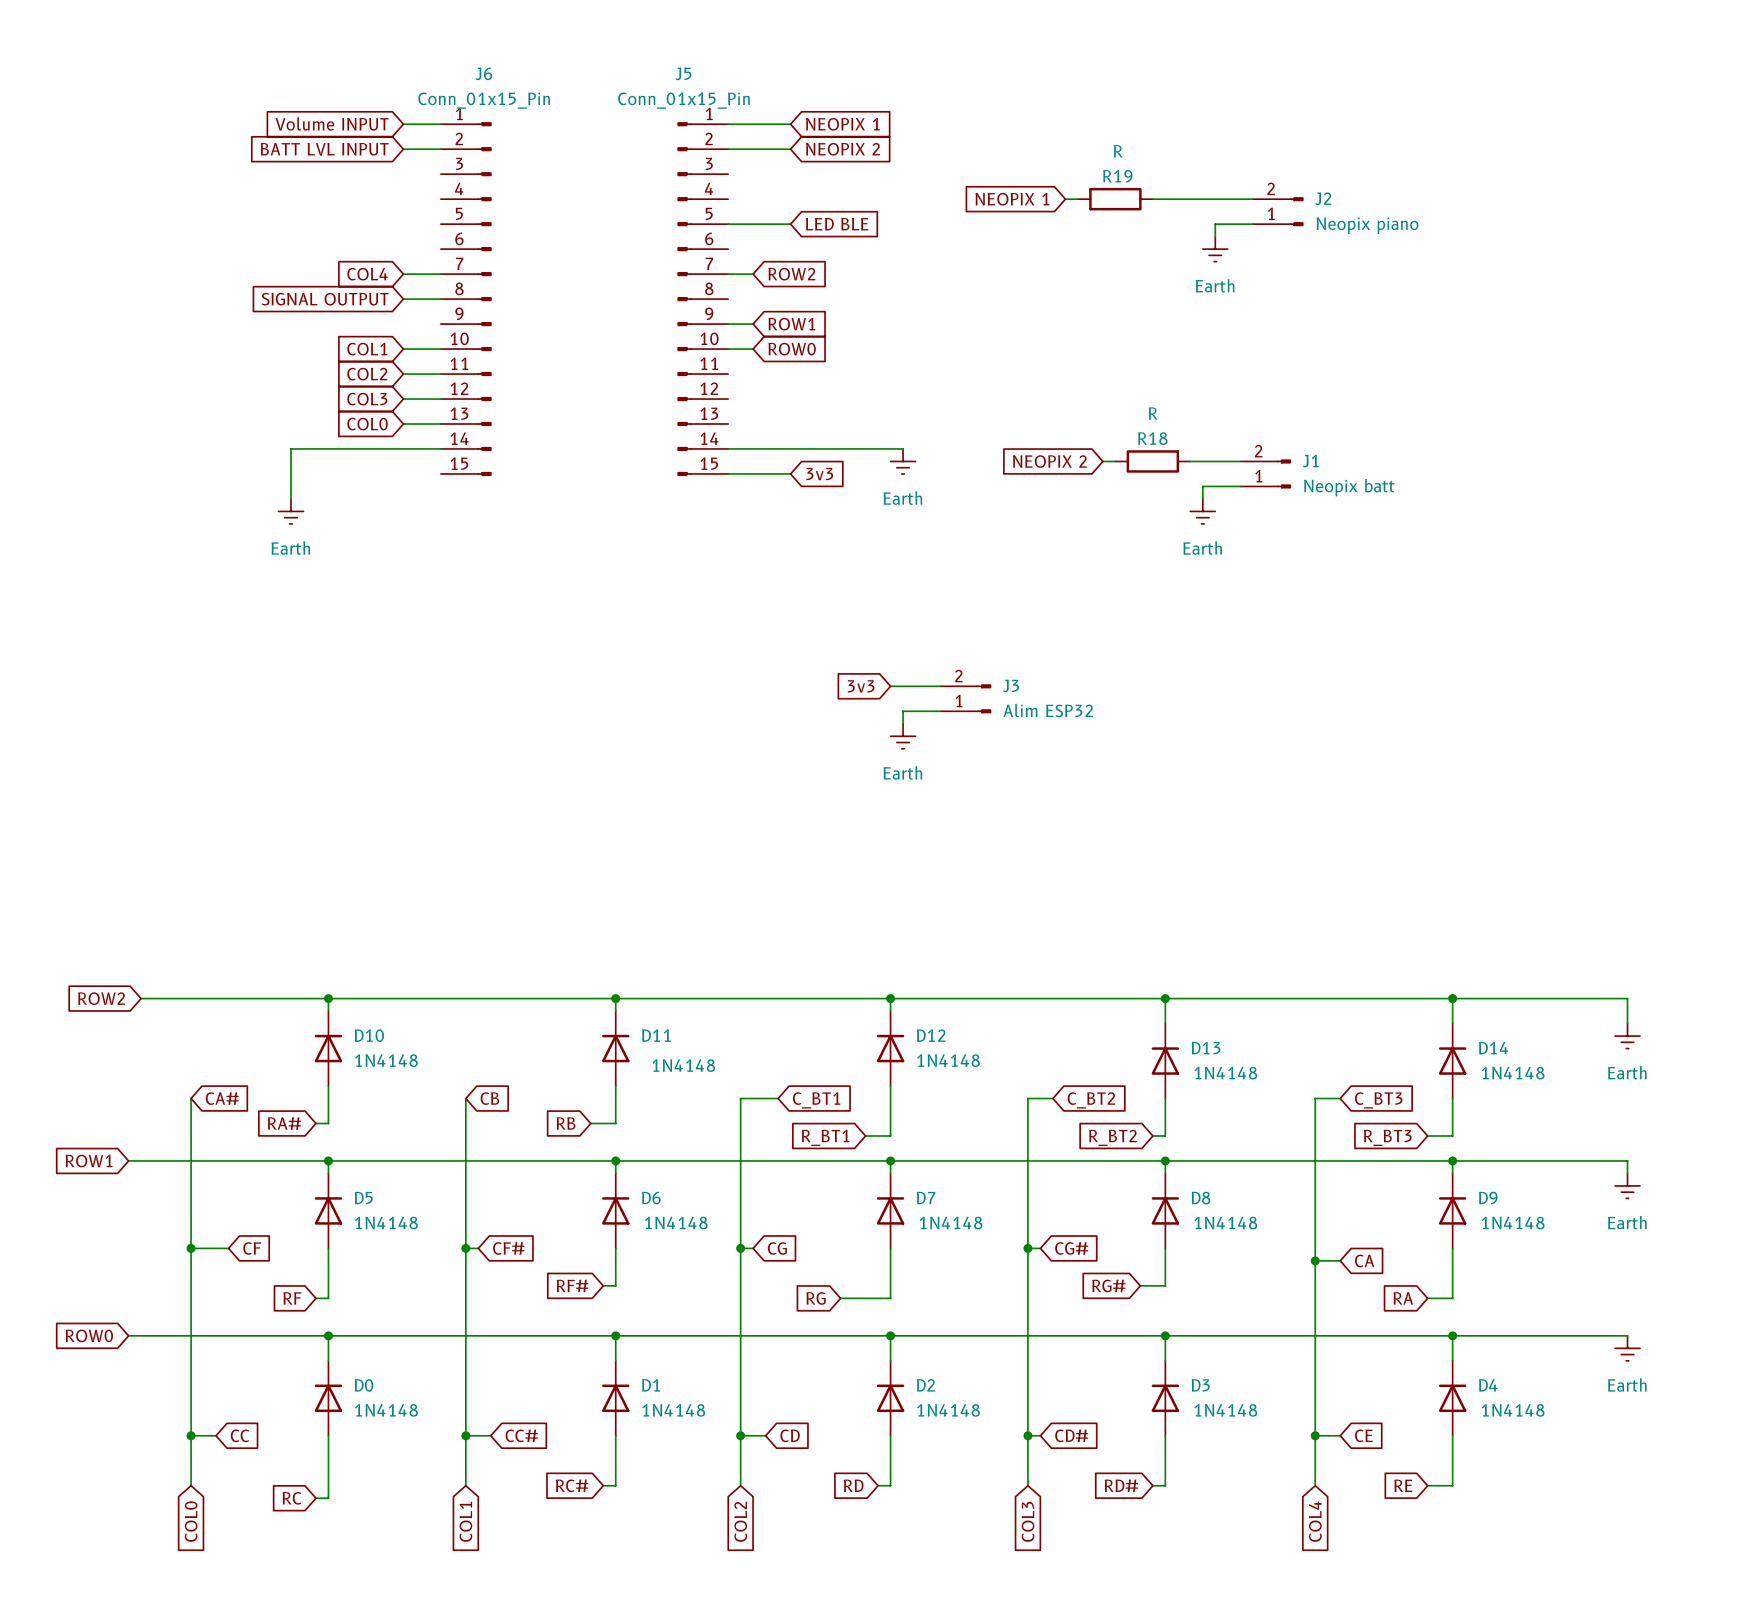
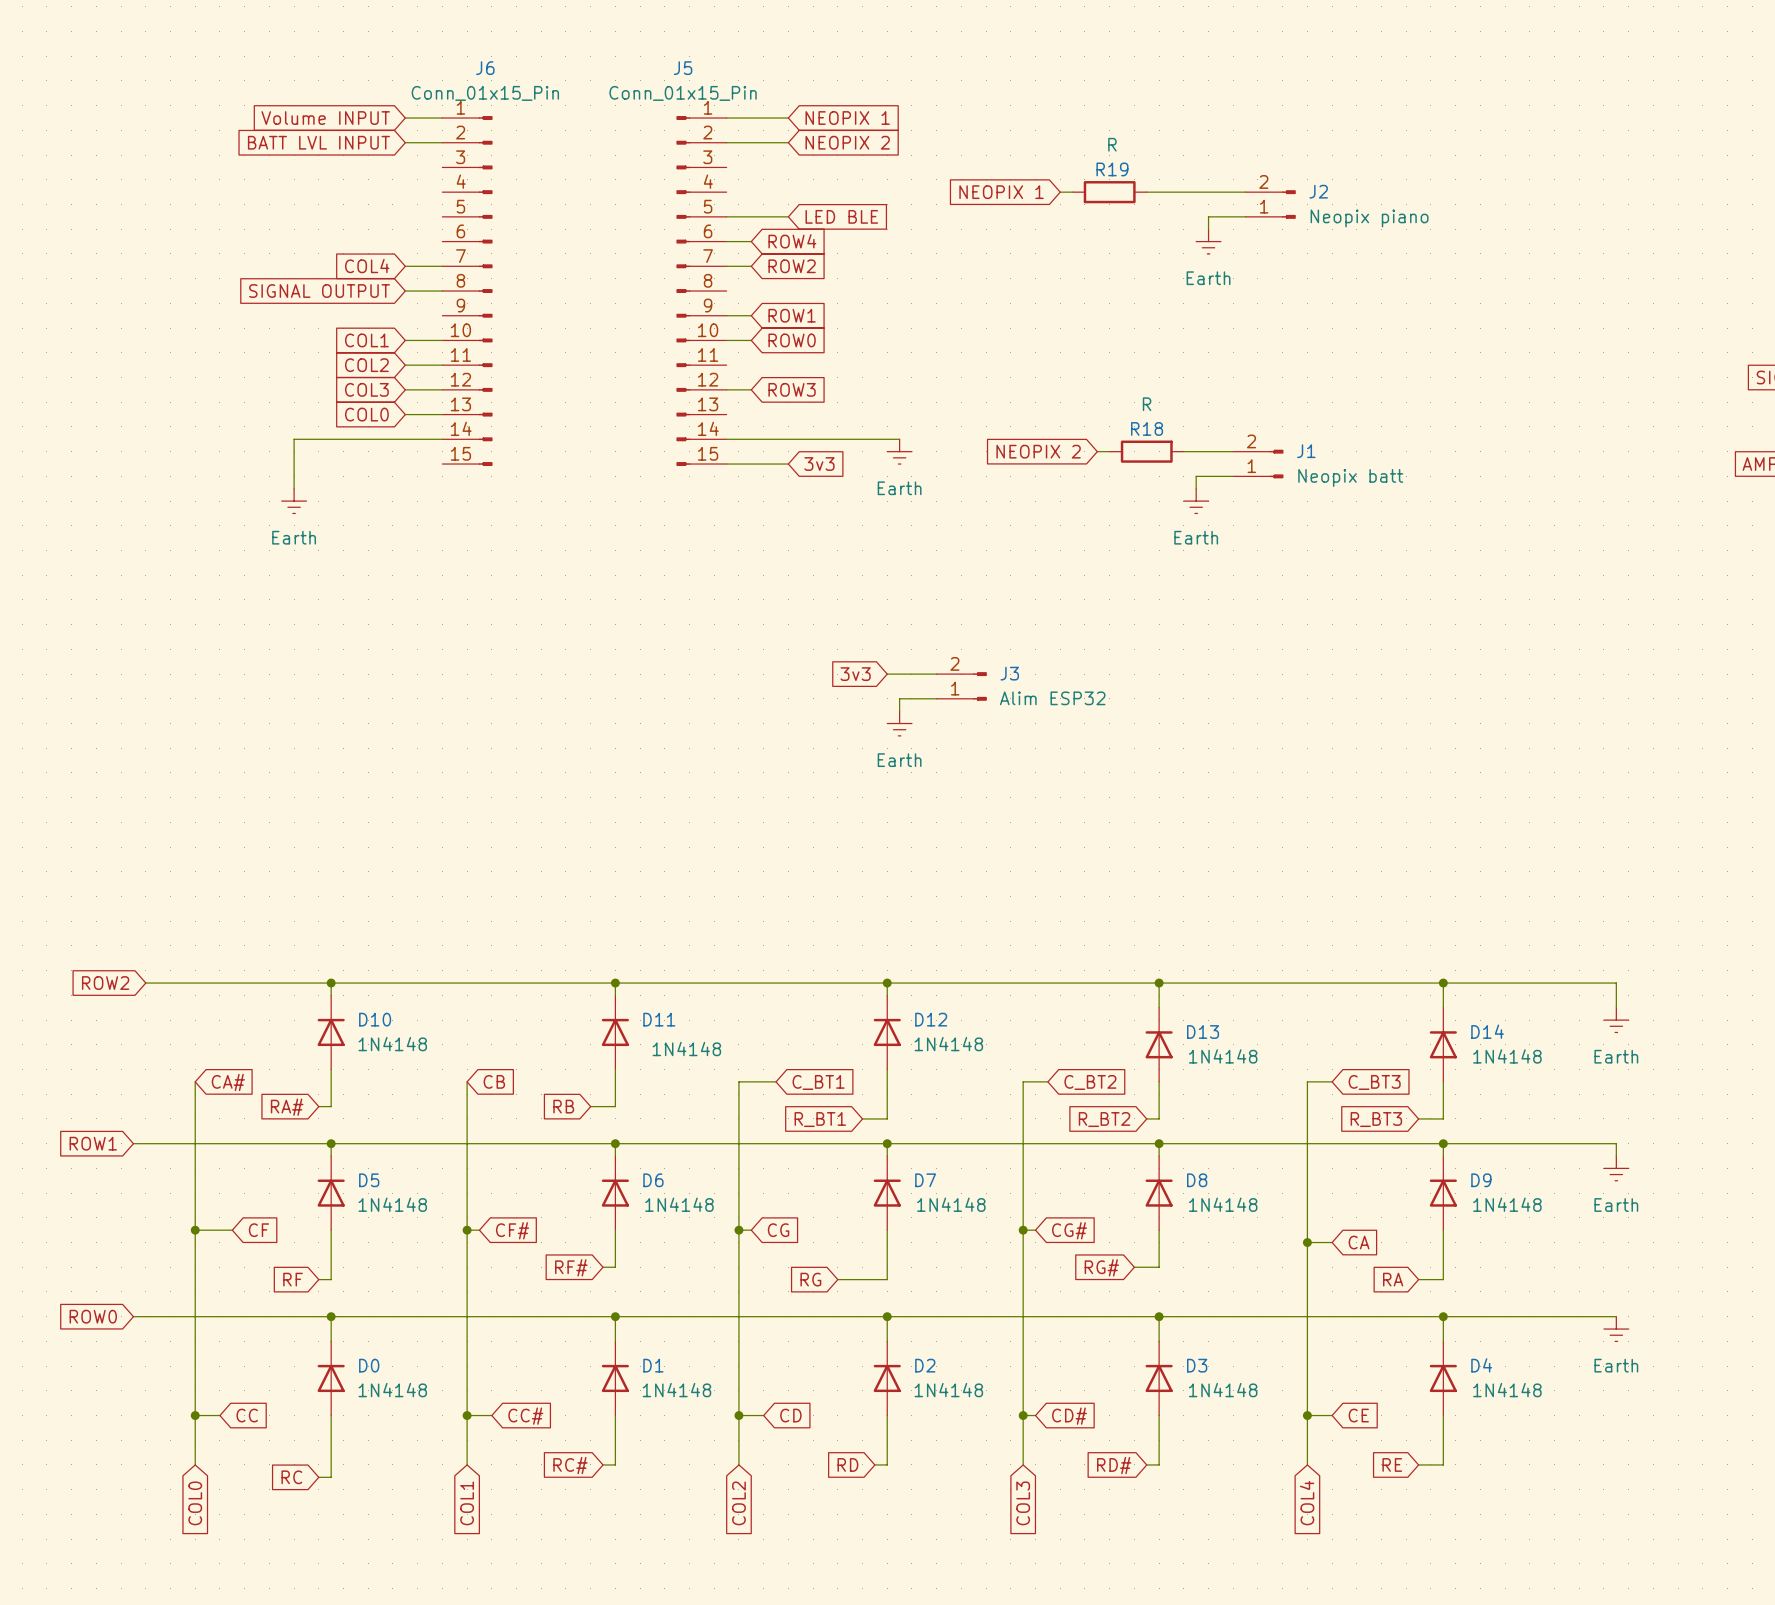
wire: none -> (726, 241) (751, 241)
global label: none -> ROW4 (792, 241)
wire: none -> (726, 389) (751, 389)
global label: none -> ROW3 (792, 389)

